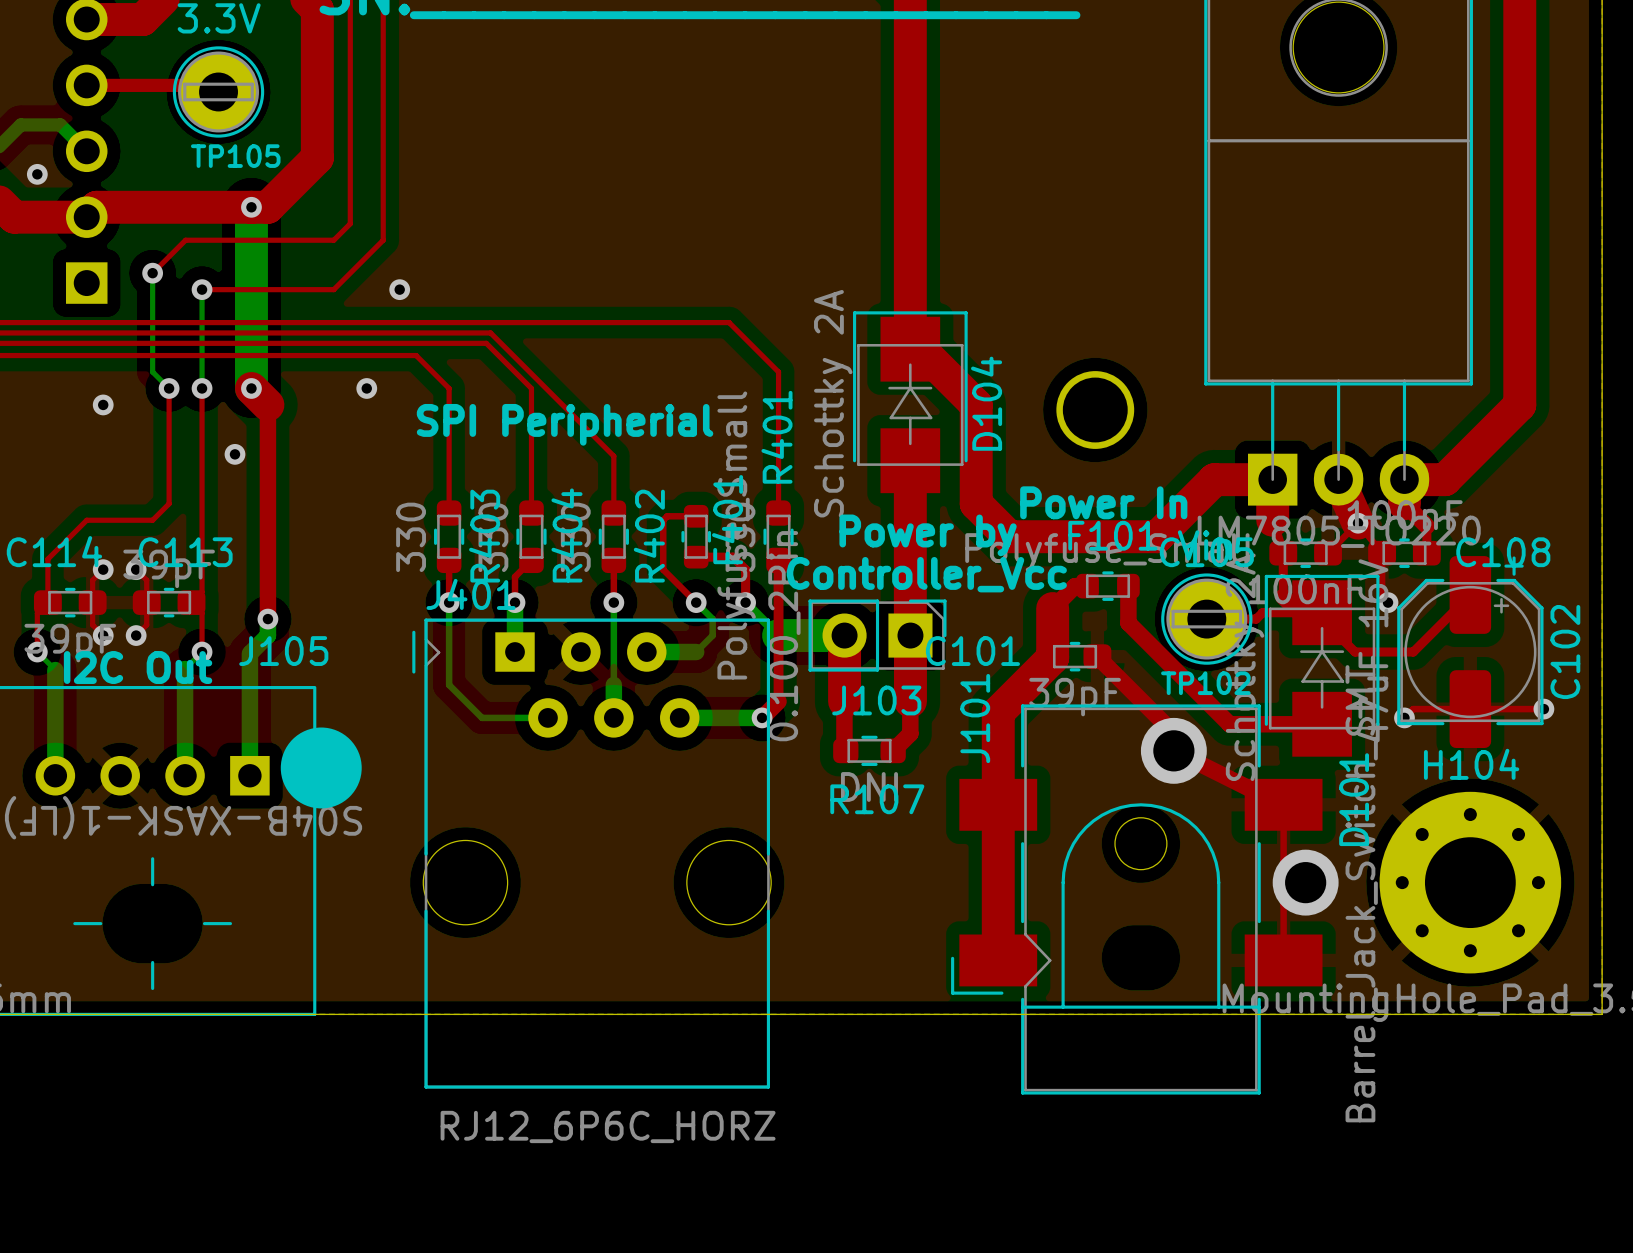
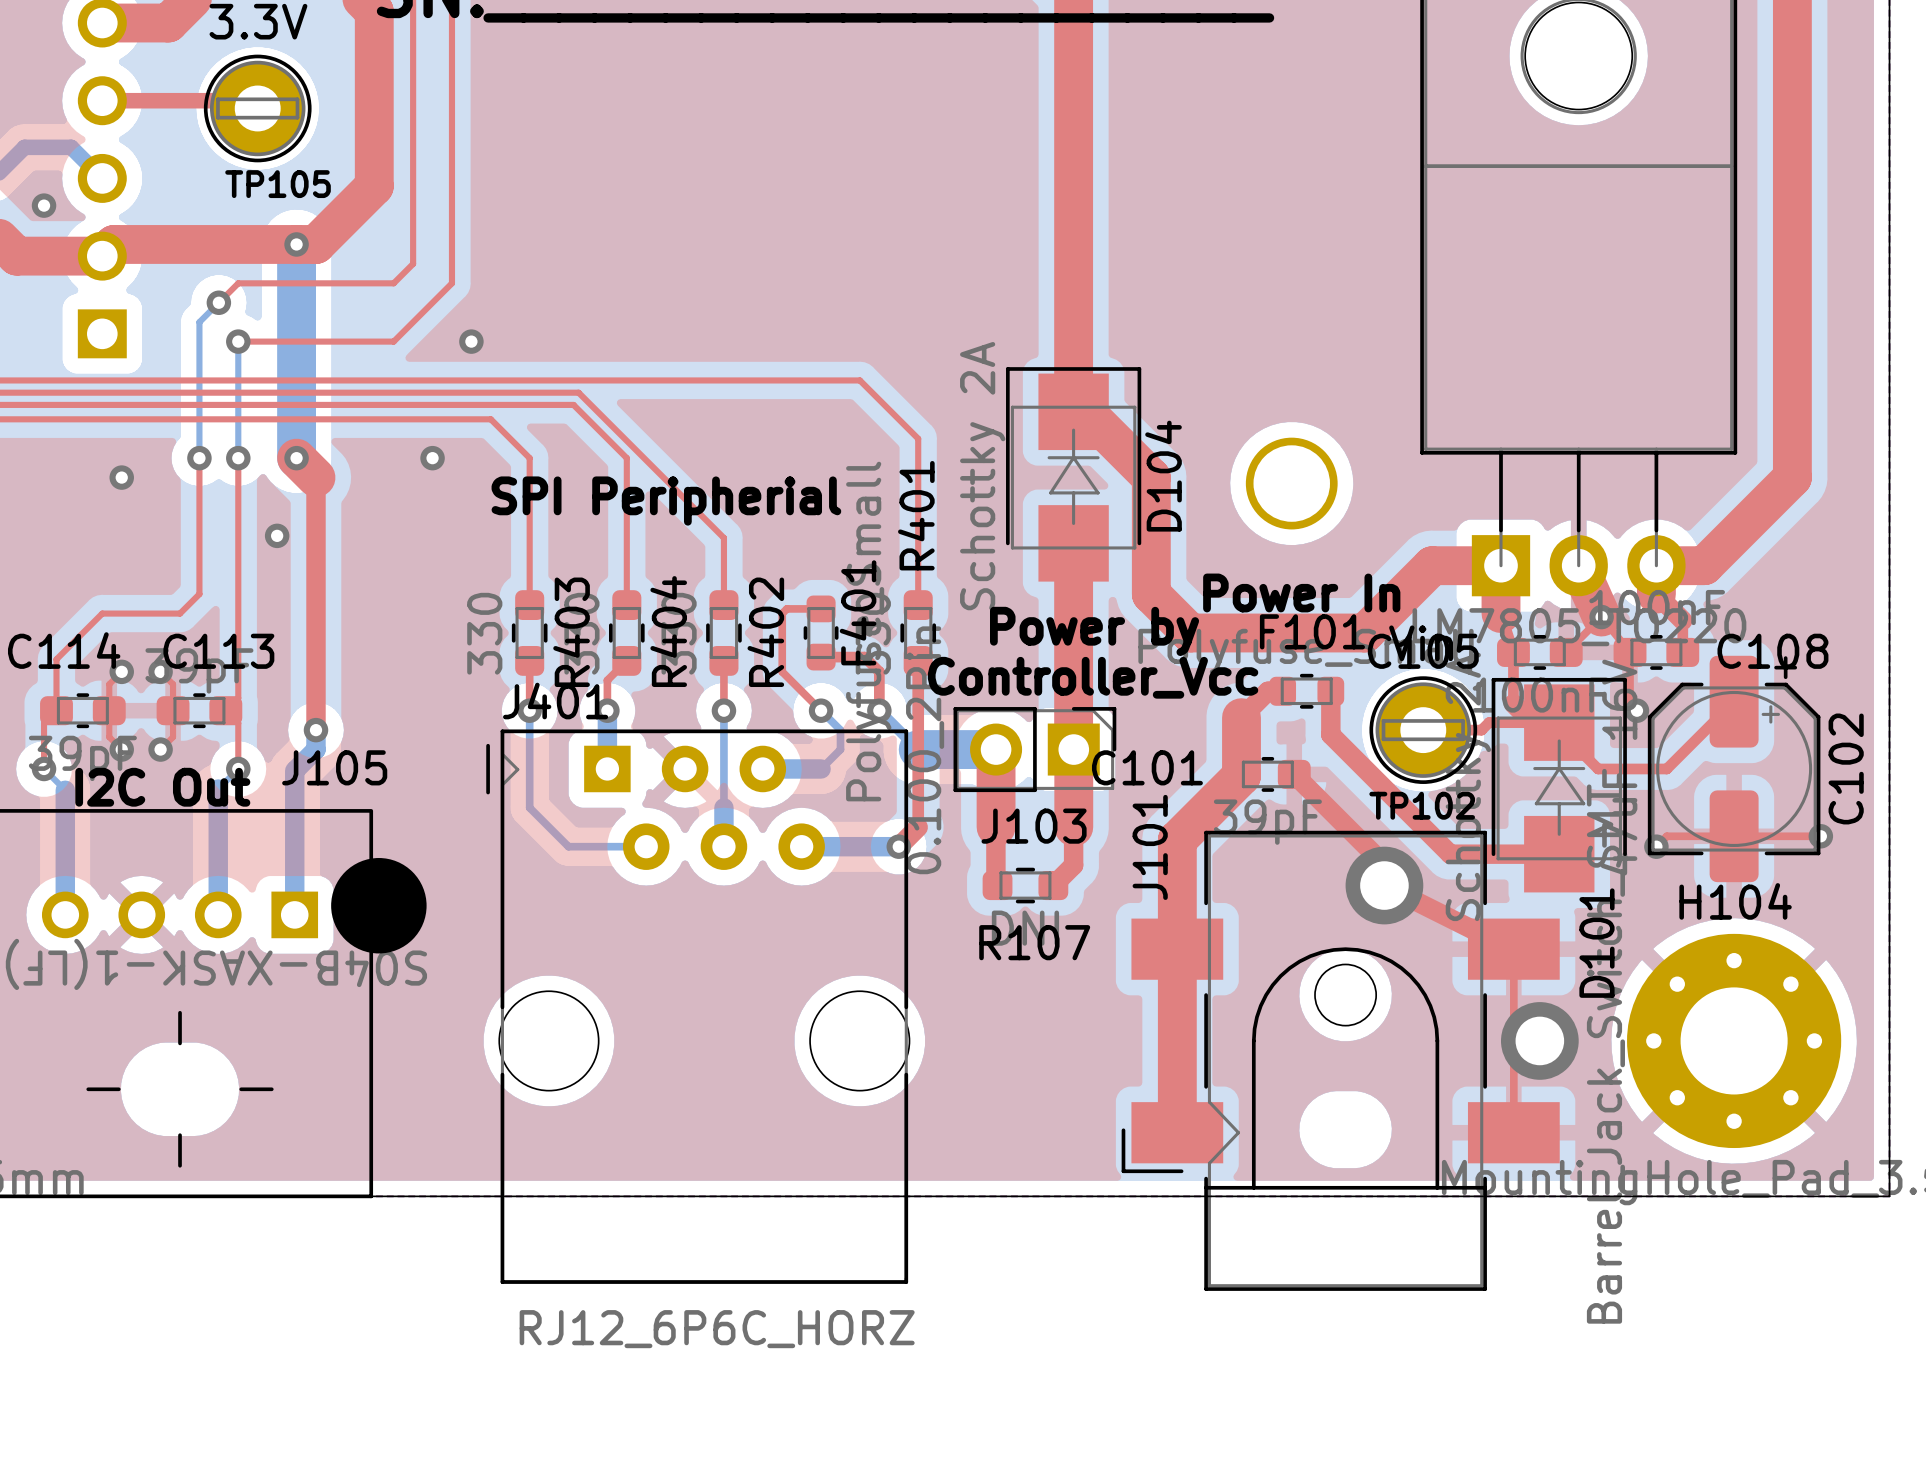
top track: (202, 240) (185, 240) (152, 273) -> (238, 283) (218, 302)
bottom track: (152, 273) (152, 372) (169, 388) -> (218, 302) (199, 322) (199, 458)
via position: (152, 273) -> (218, 302)

